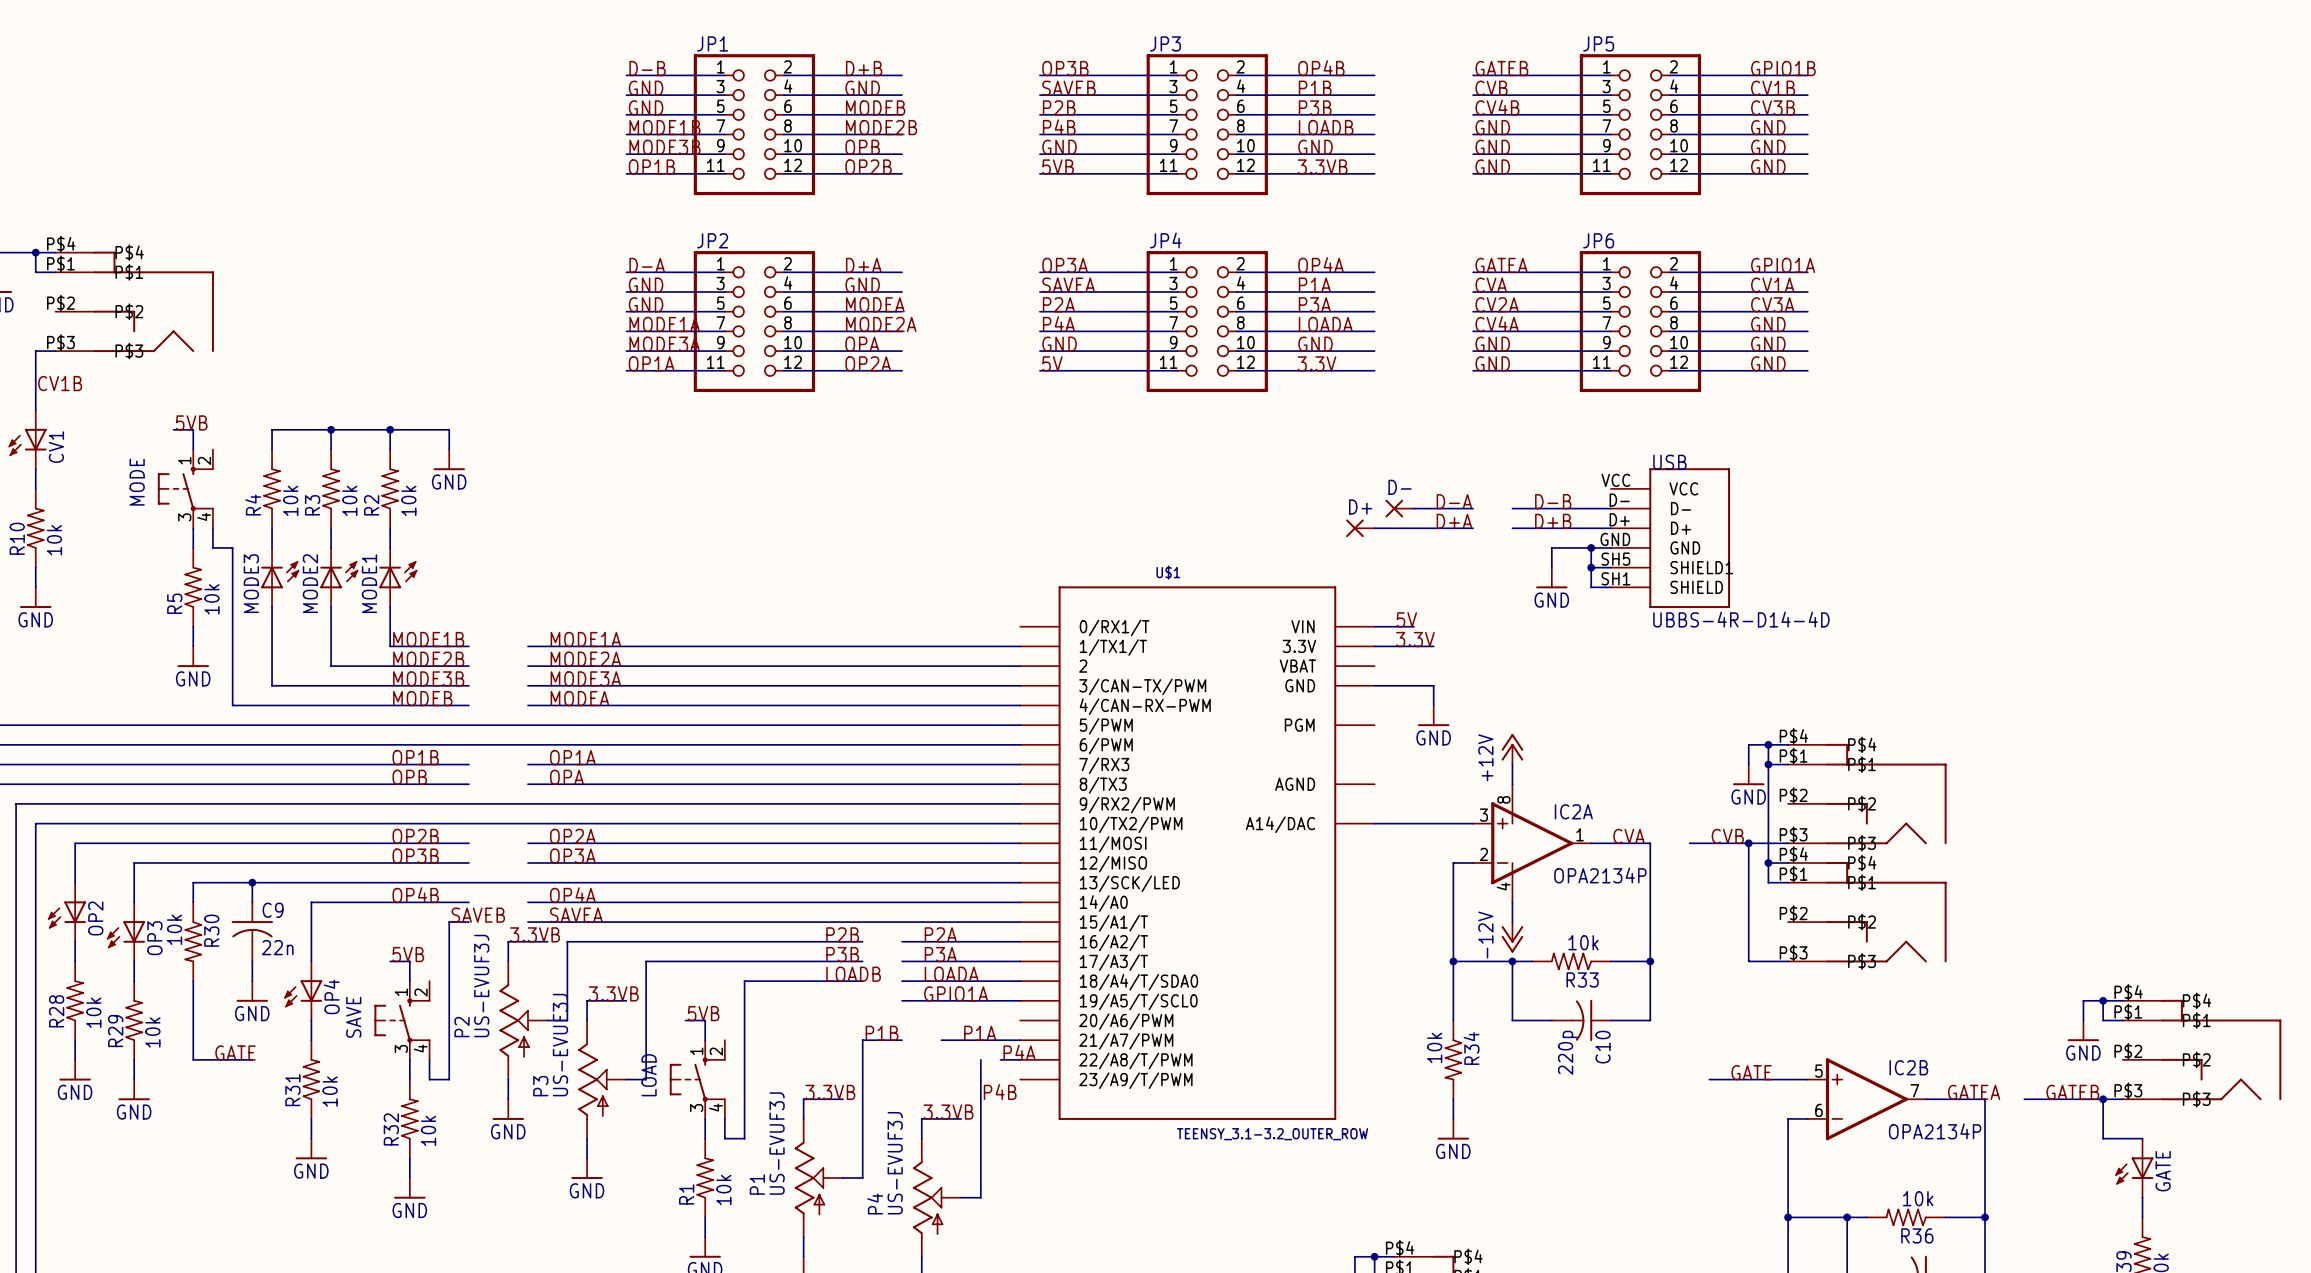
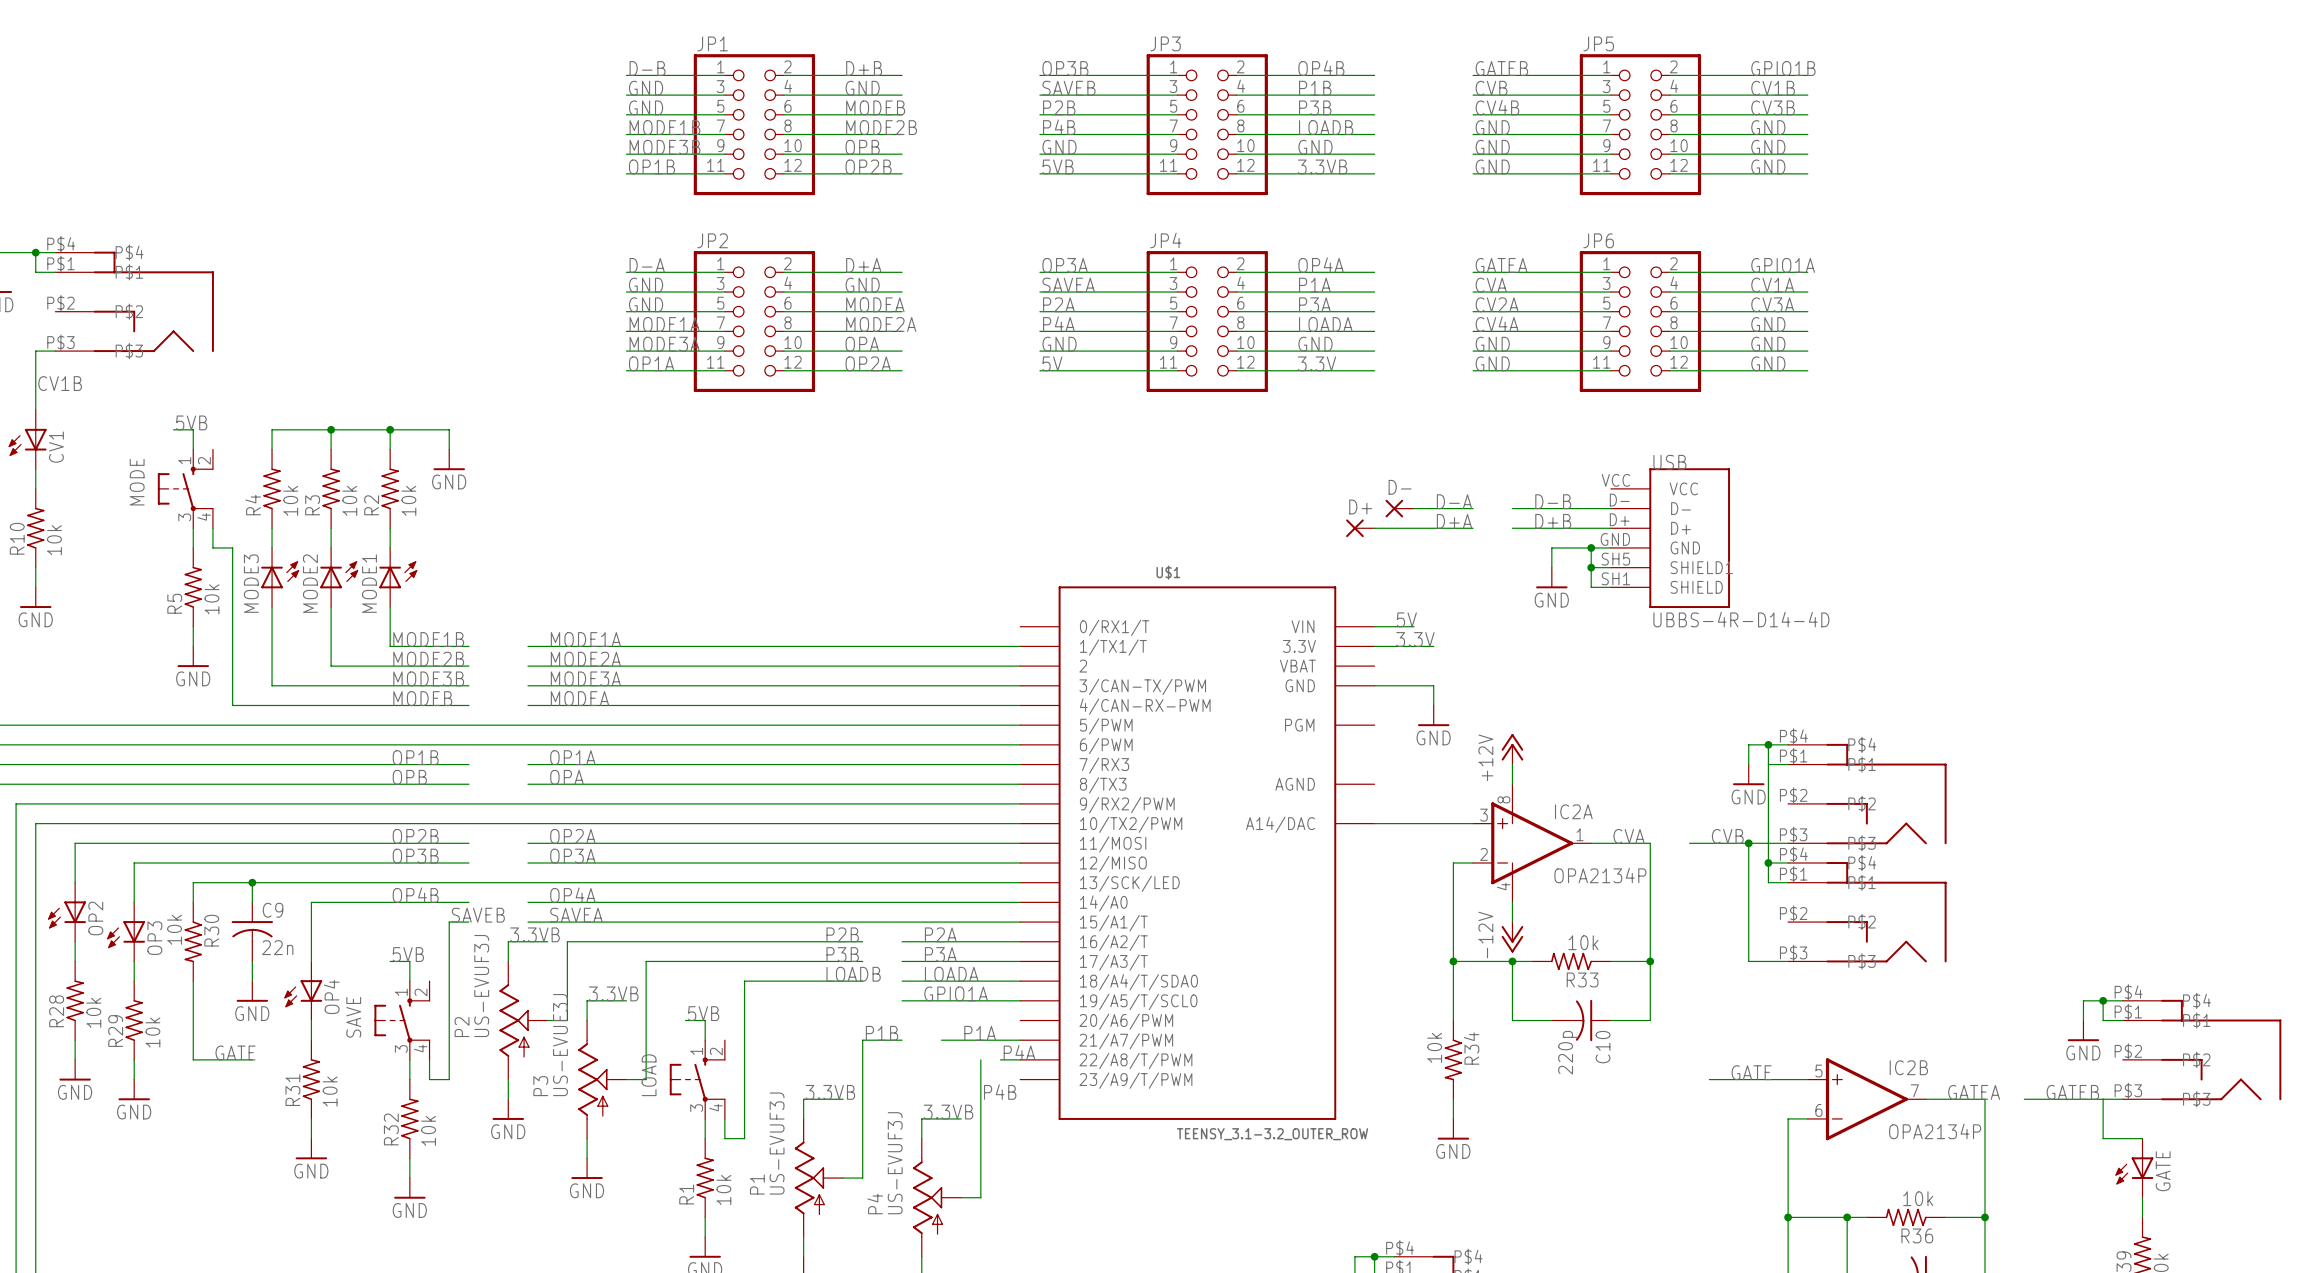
junction: (1768, 764) -> none
junction: (2103, 1099) -> none

